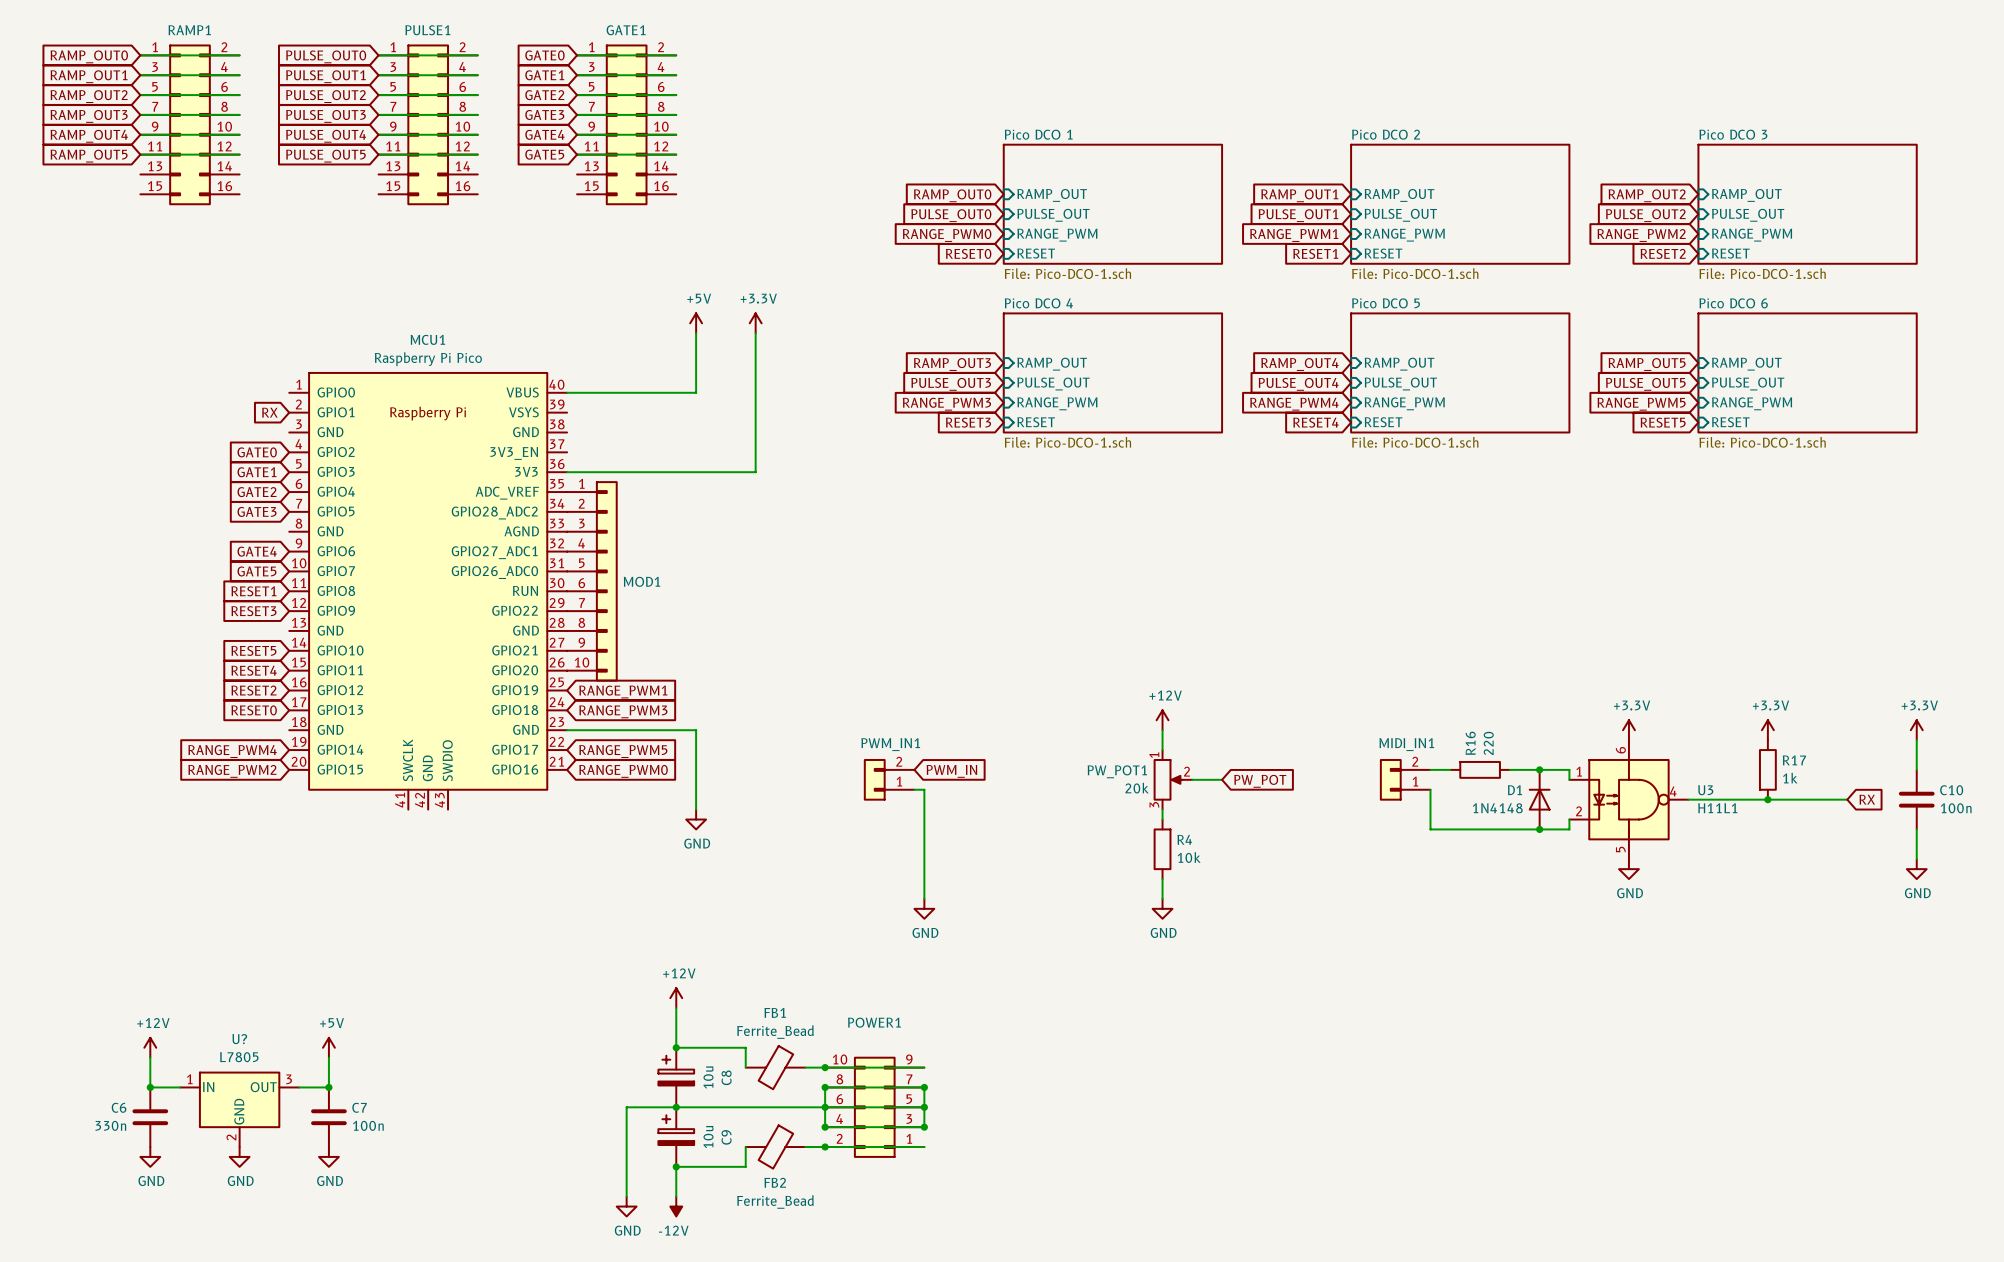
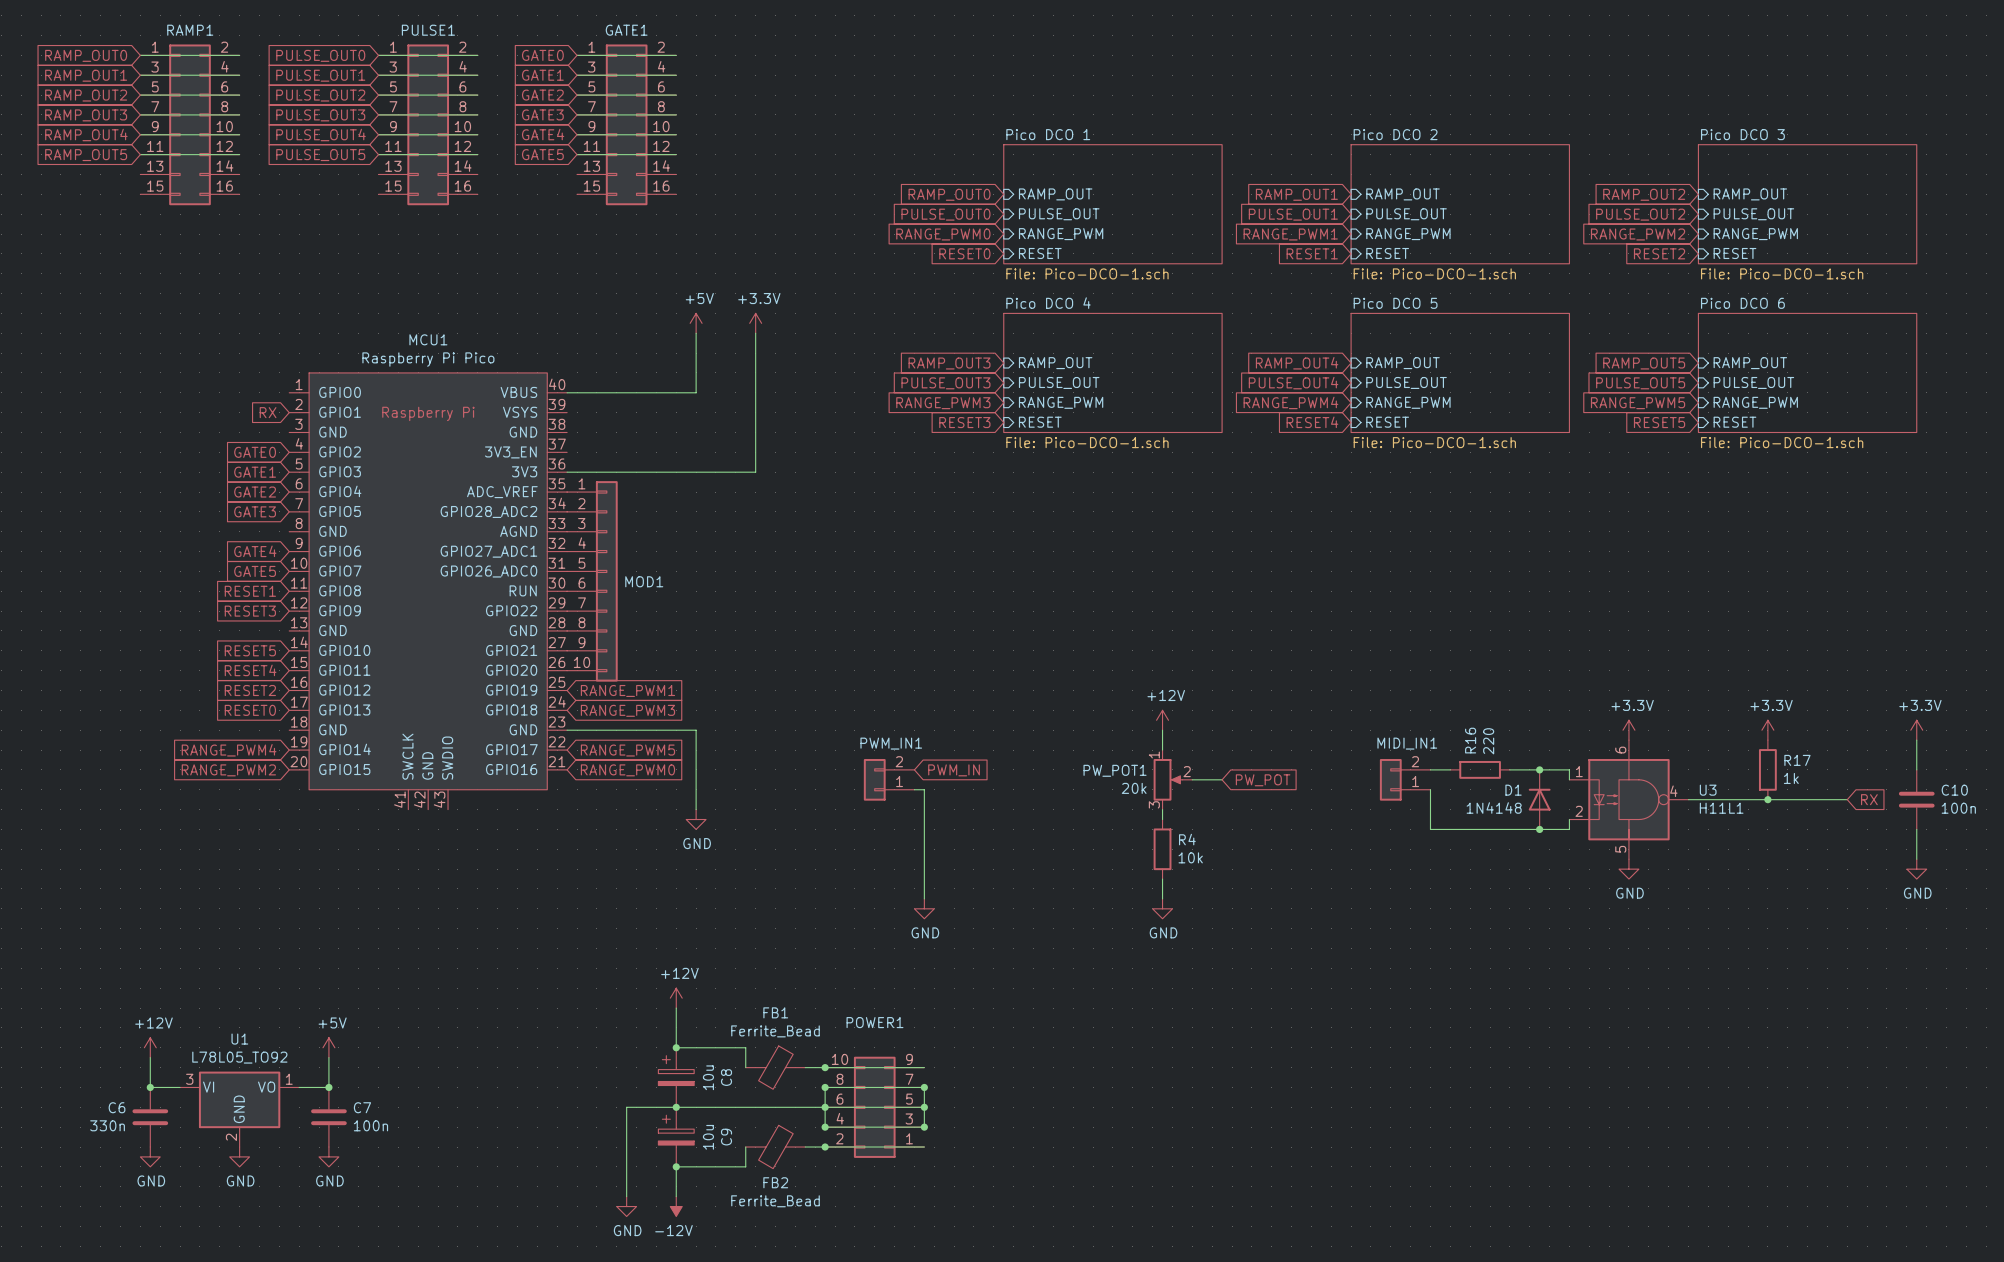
U? name: U? (239, 1039) -> U1 (239, 1039)
U? value: L7805 (239, 1057) -> L78L05_TO92 (239, 1057)
U? pin number: 1 (189, 1079) -> 3 (189, 1079)
U? pin number: 3 (289, 1079) -> 1 (289, 1079)
U? pin name: IN (208, 1087) -> VI (208, 1087)
U? pin name: OUT (263, 1087) -> VO (266, 1087)

